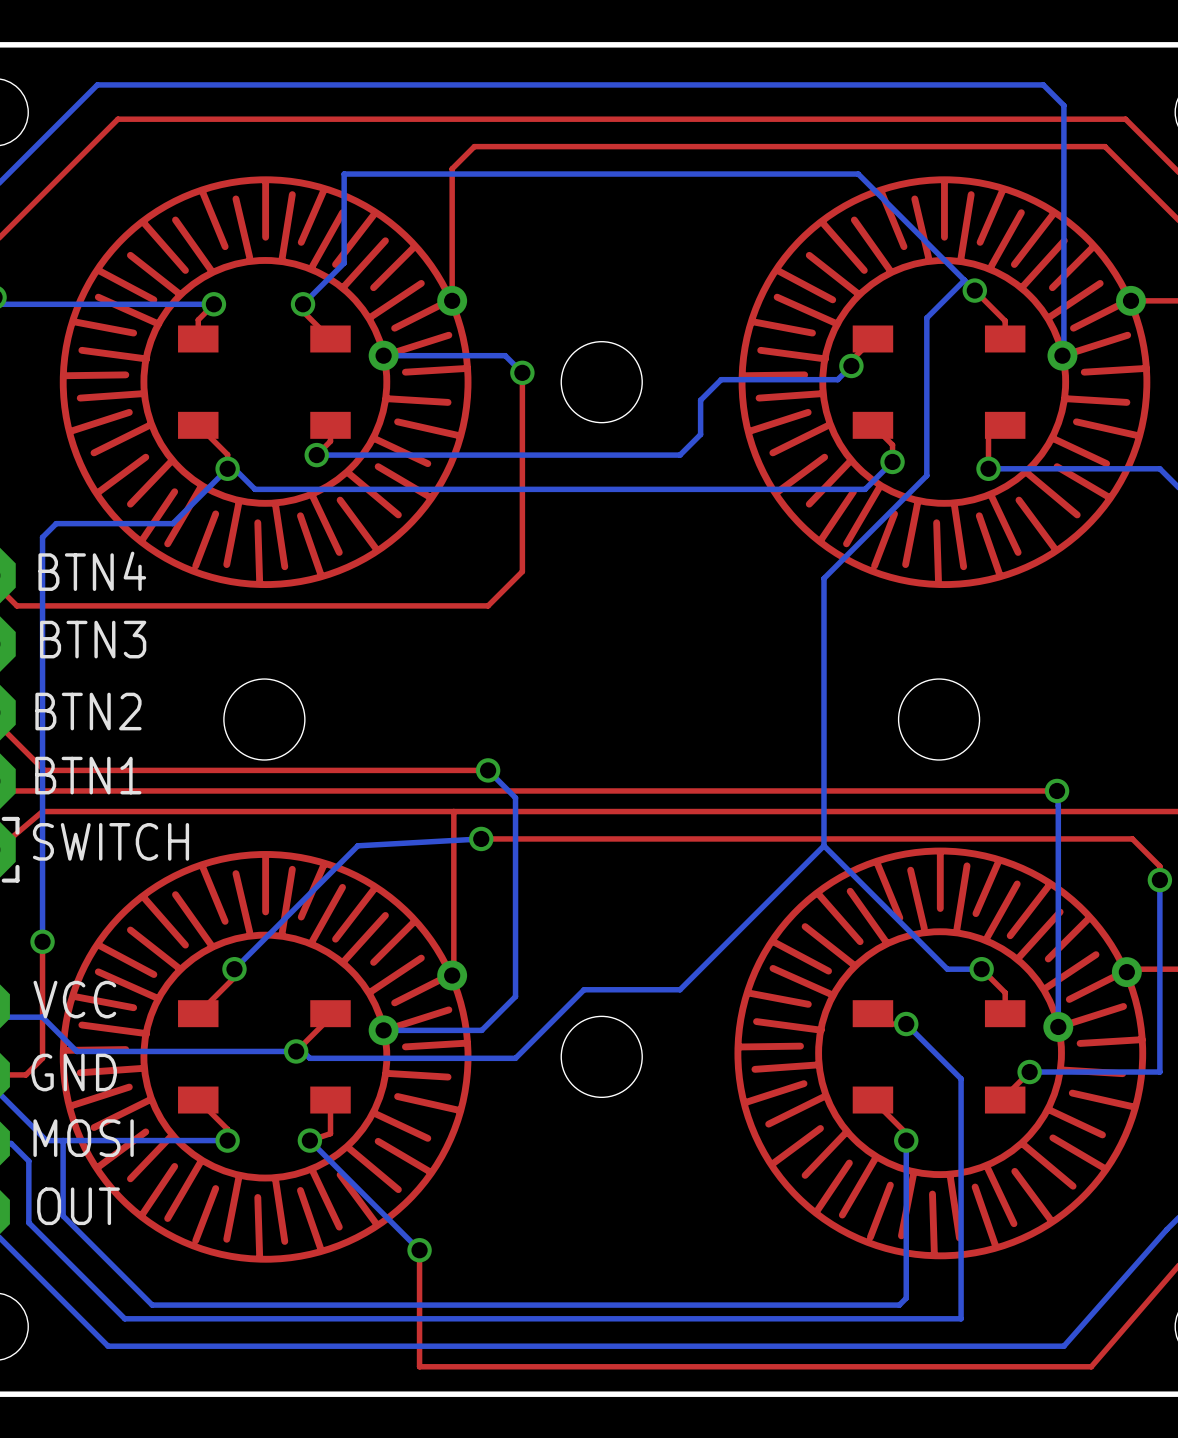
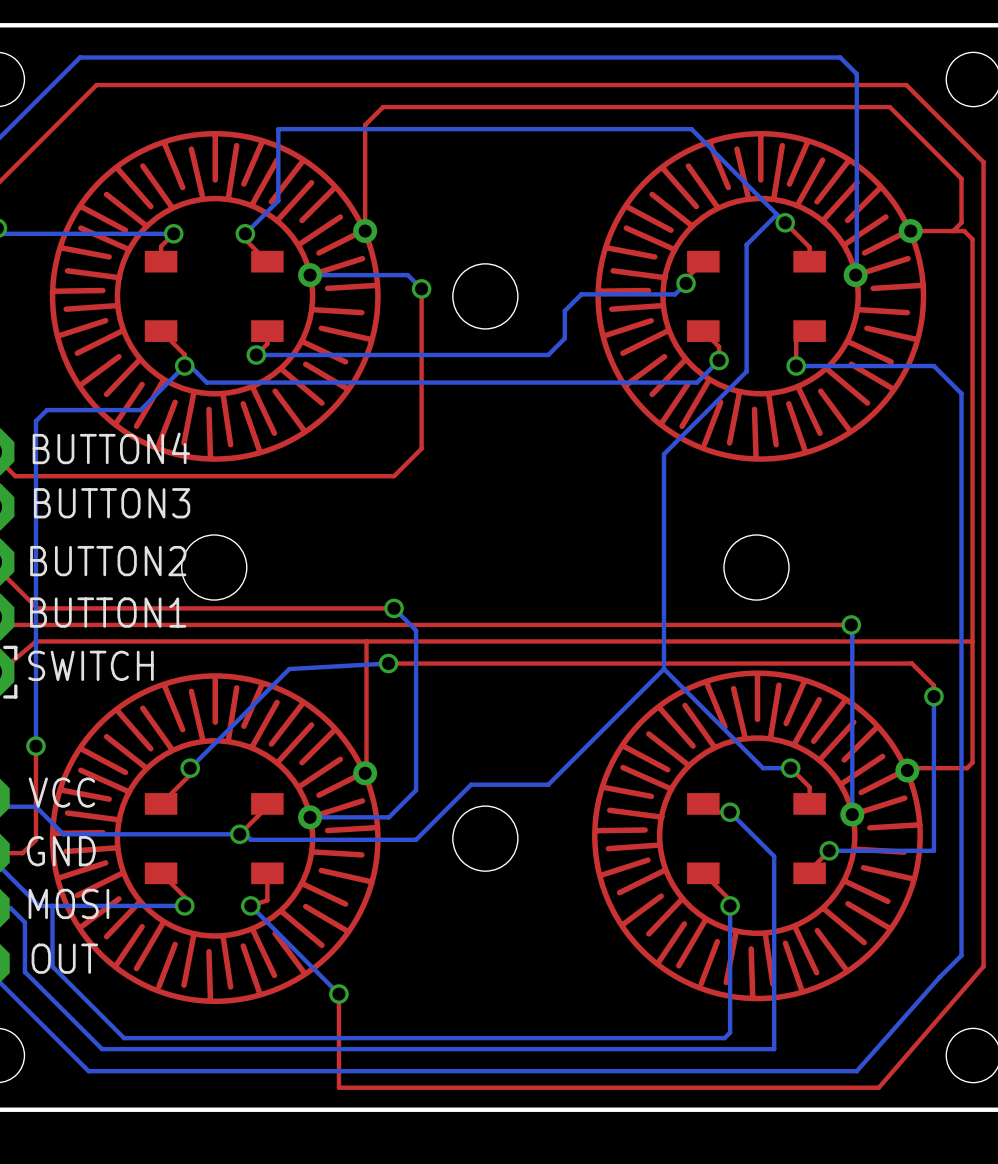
BTN4 name: BTN4 (92, 571) -> BUTTON4 (111, 448)
BTN3 name: BTN3 (93, 639) -> BUTTON3 (112, 503)
BTN2 name: BTN2 (88, 711) -> BUTTON2 (108, 561)
BTN1 name: BTN1 (88, 775) -> BUTTON1 (108, 612)

